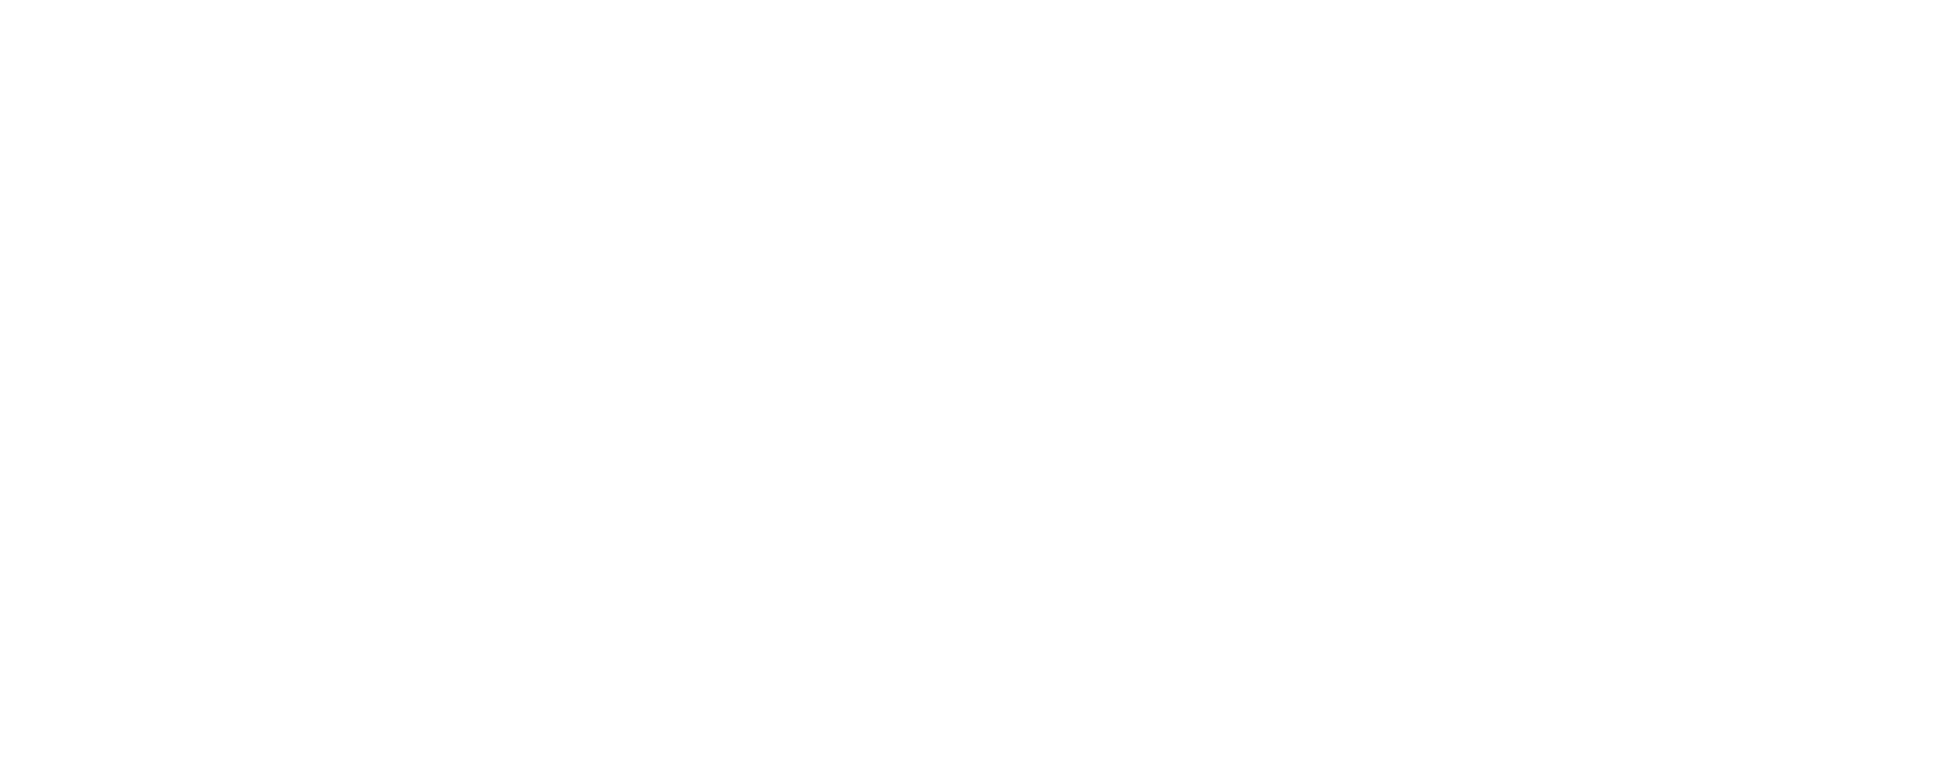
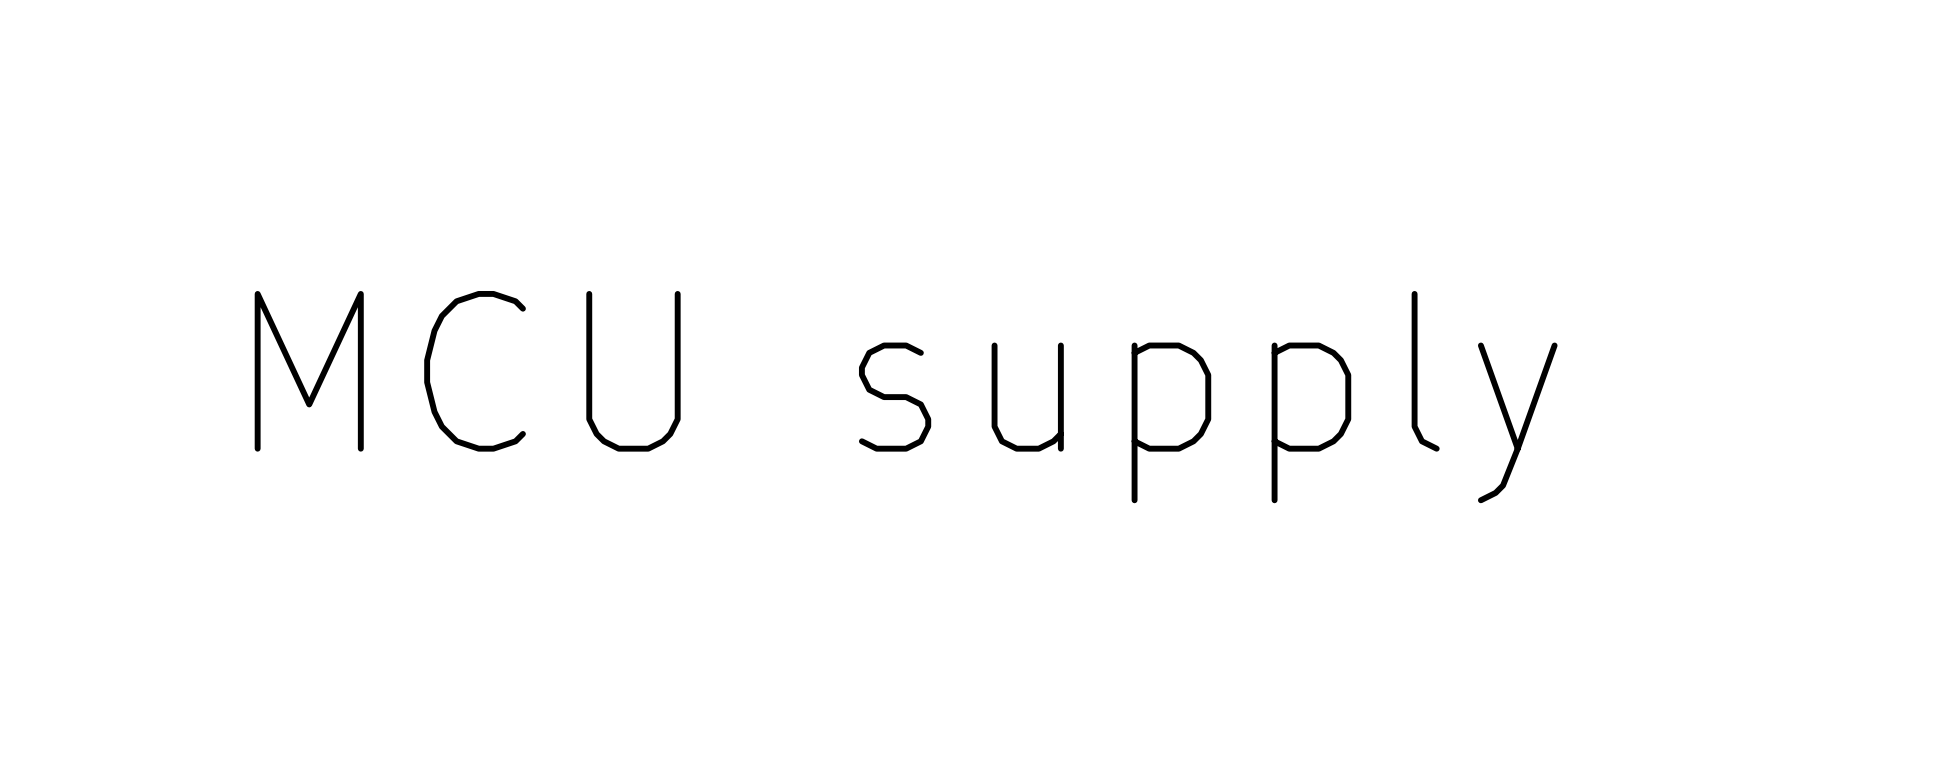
text: none -> MCU supply (906, 397)

